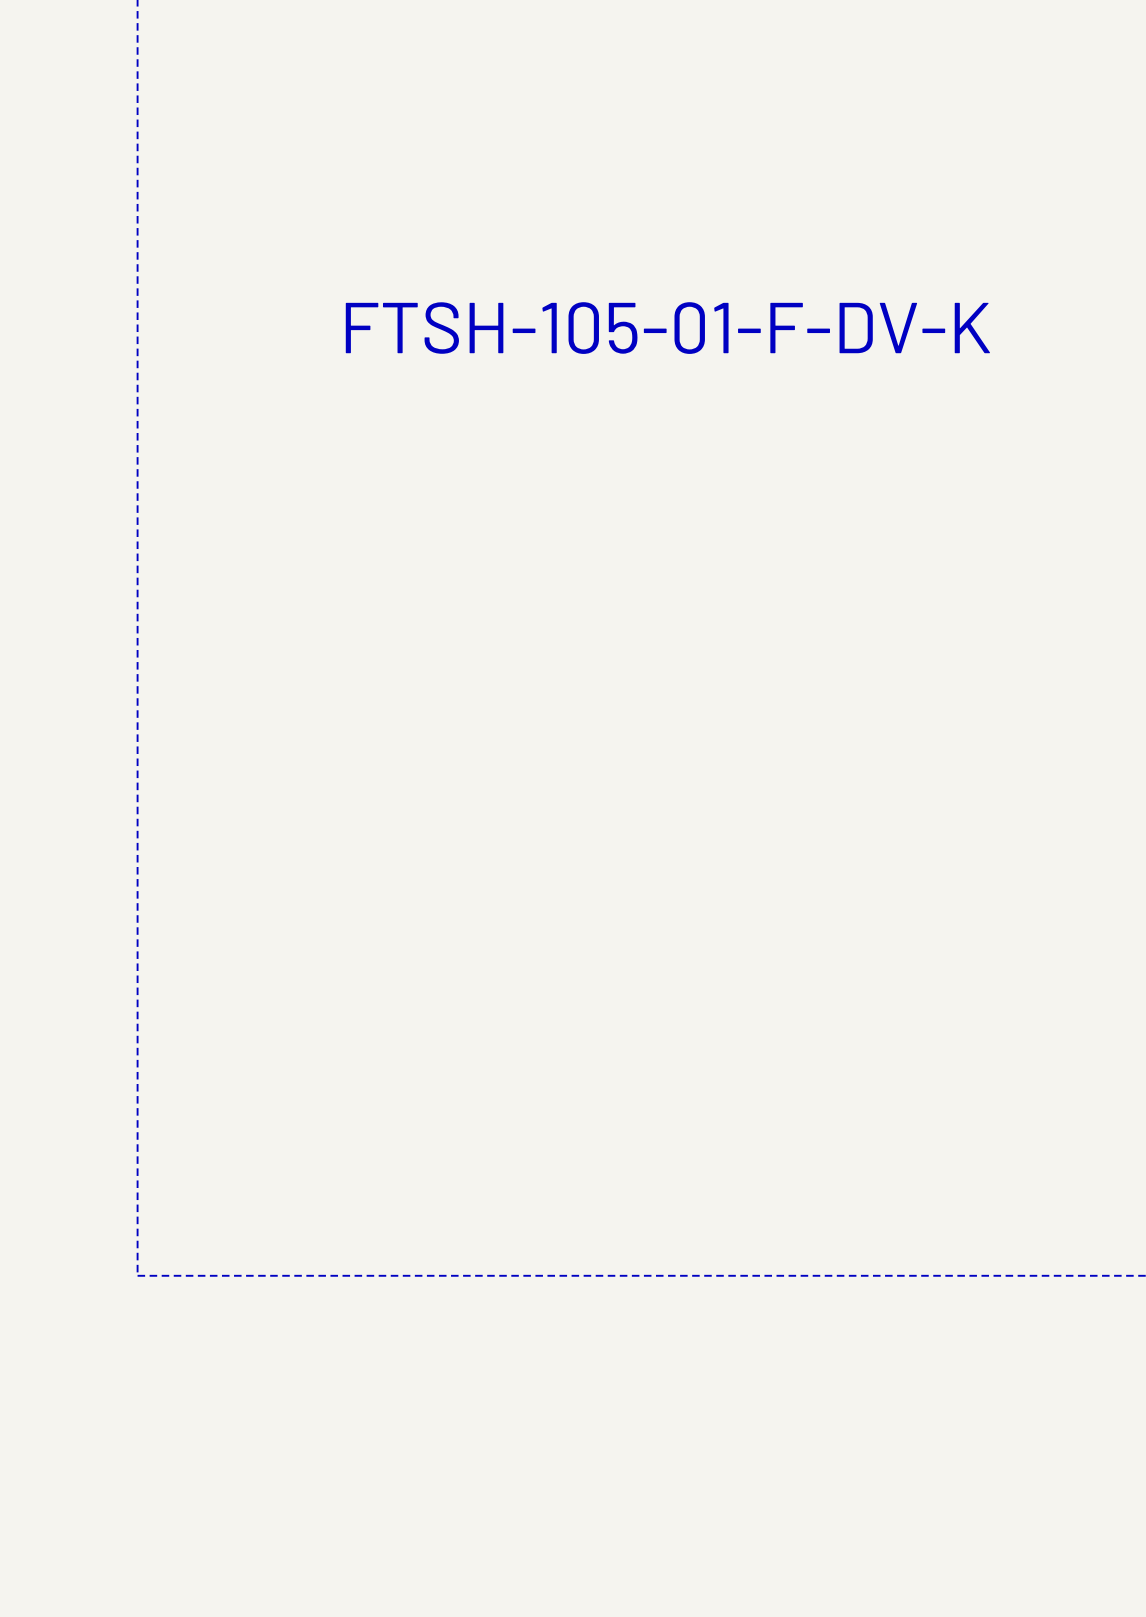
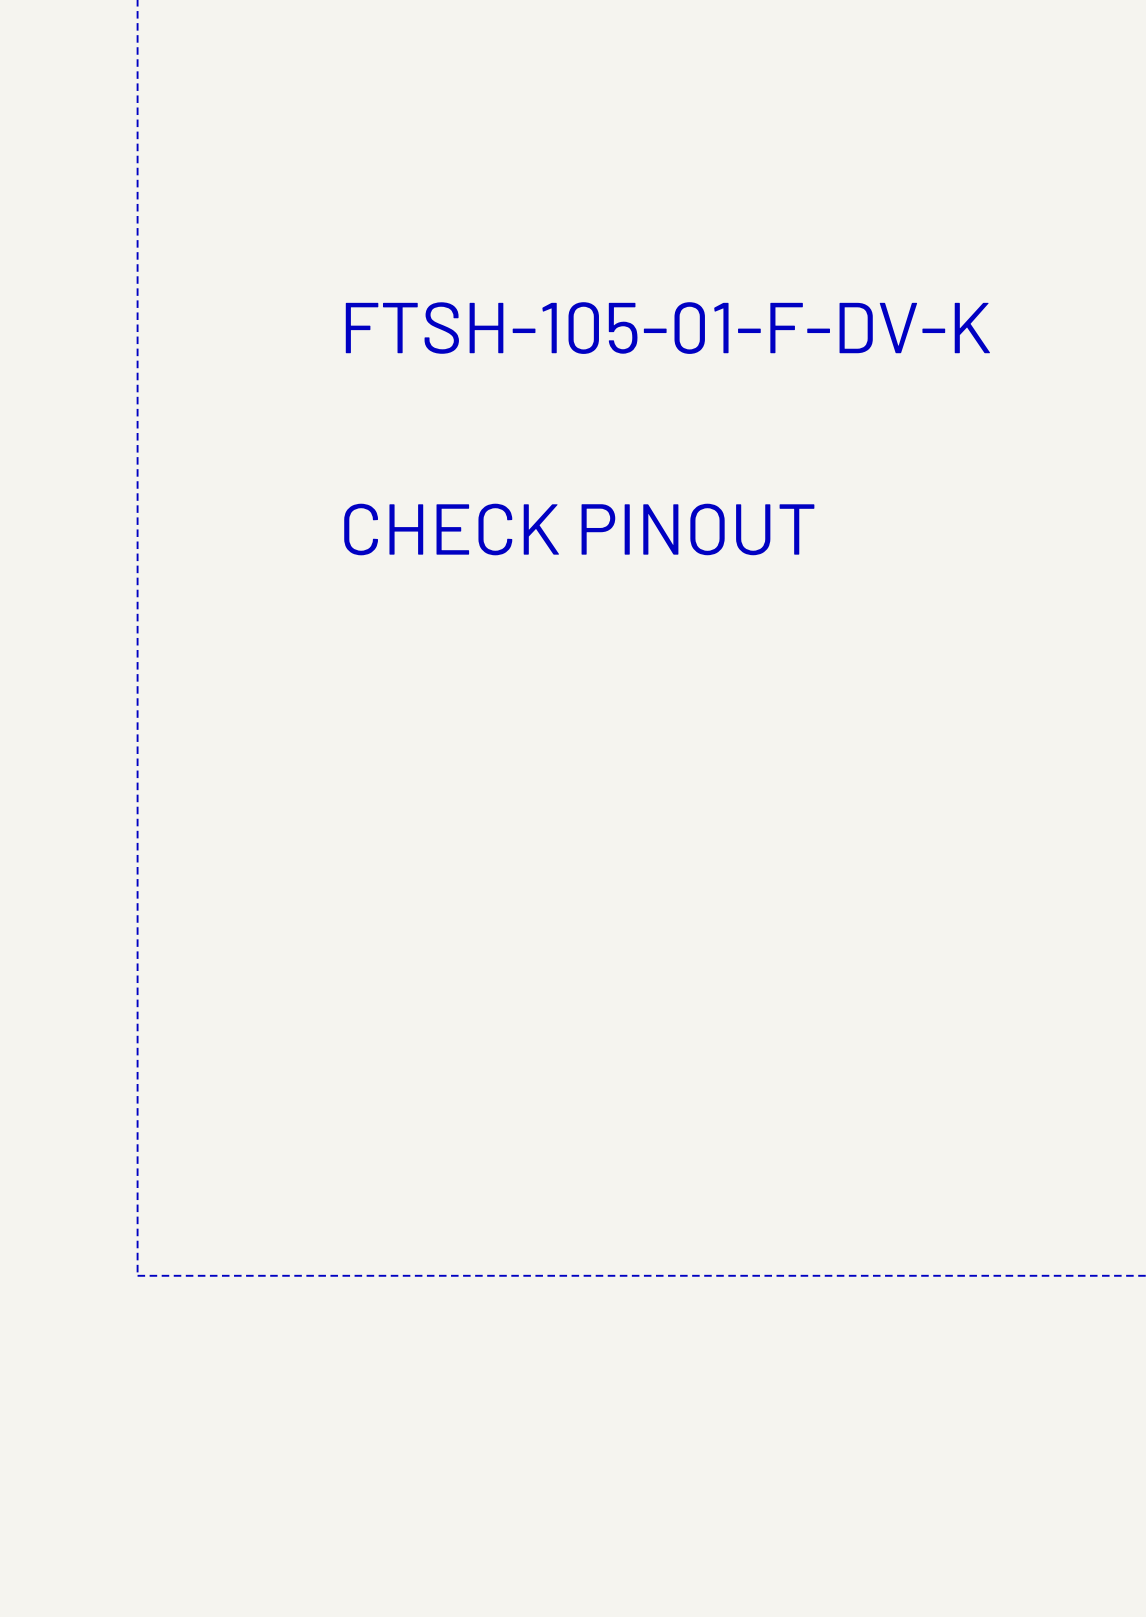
text: none -> CHECK PINOUT (579, 529)

